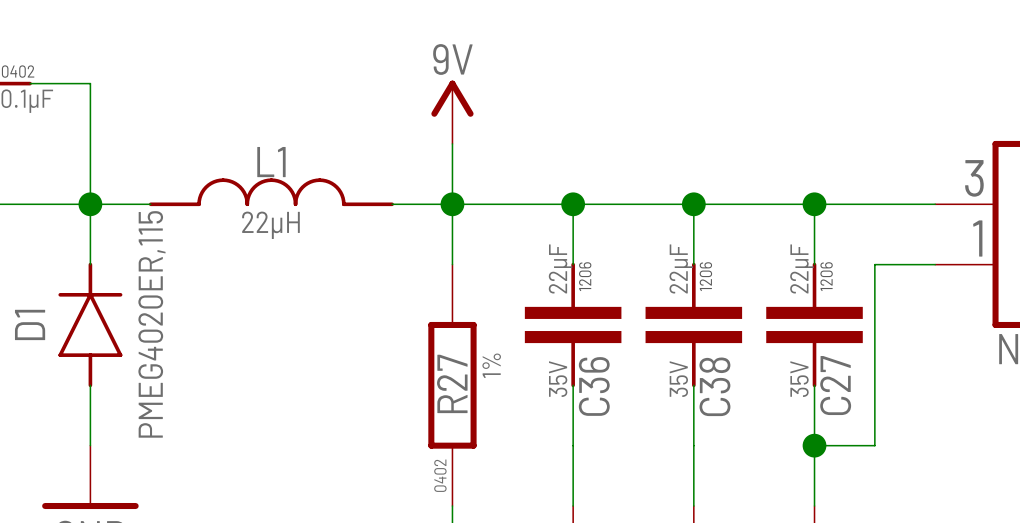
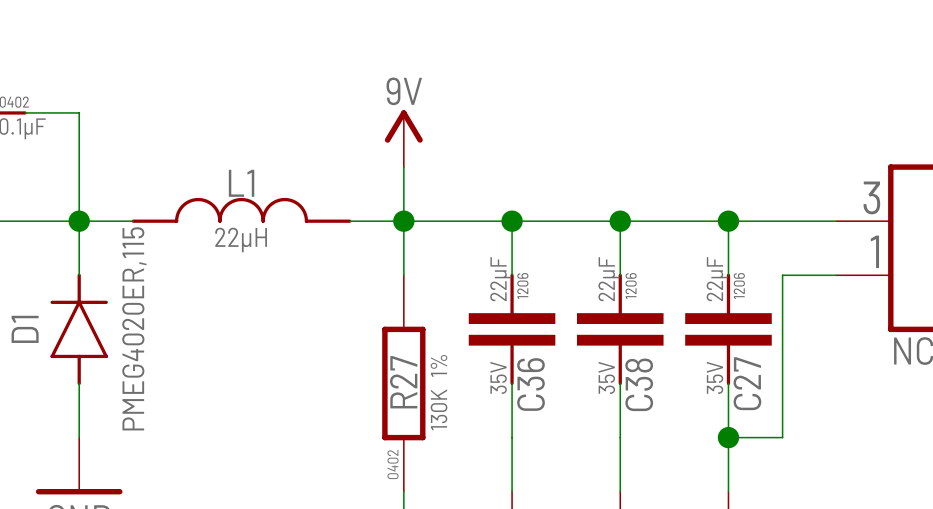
R27 value: none -> 130K (439, 409)

